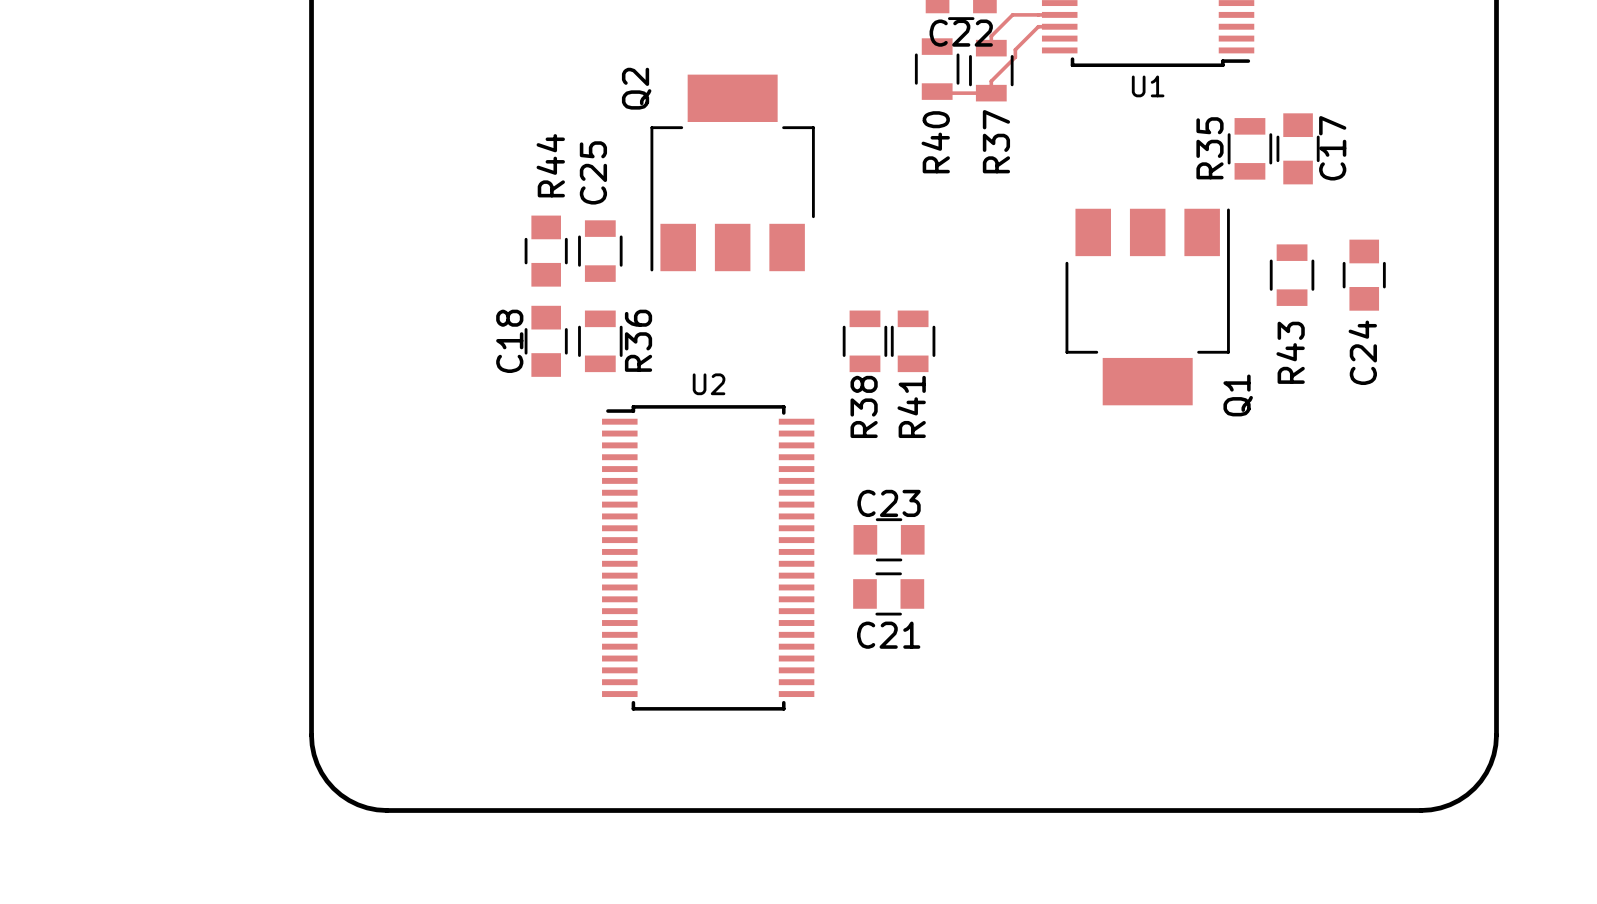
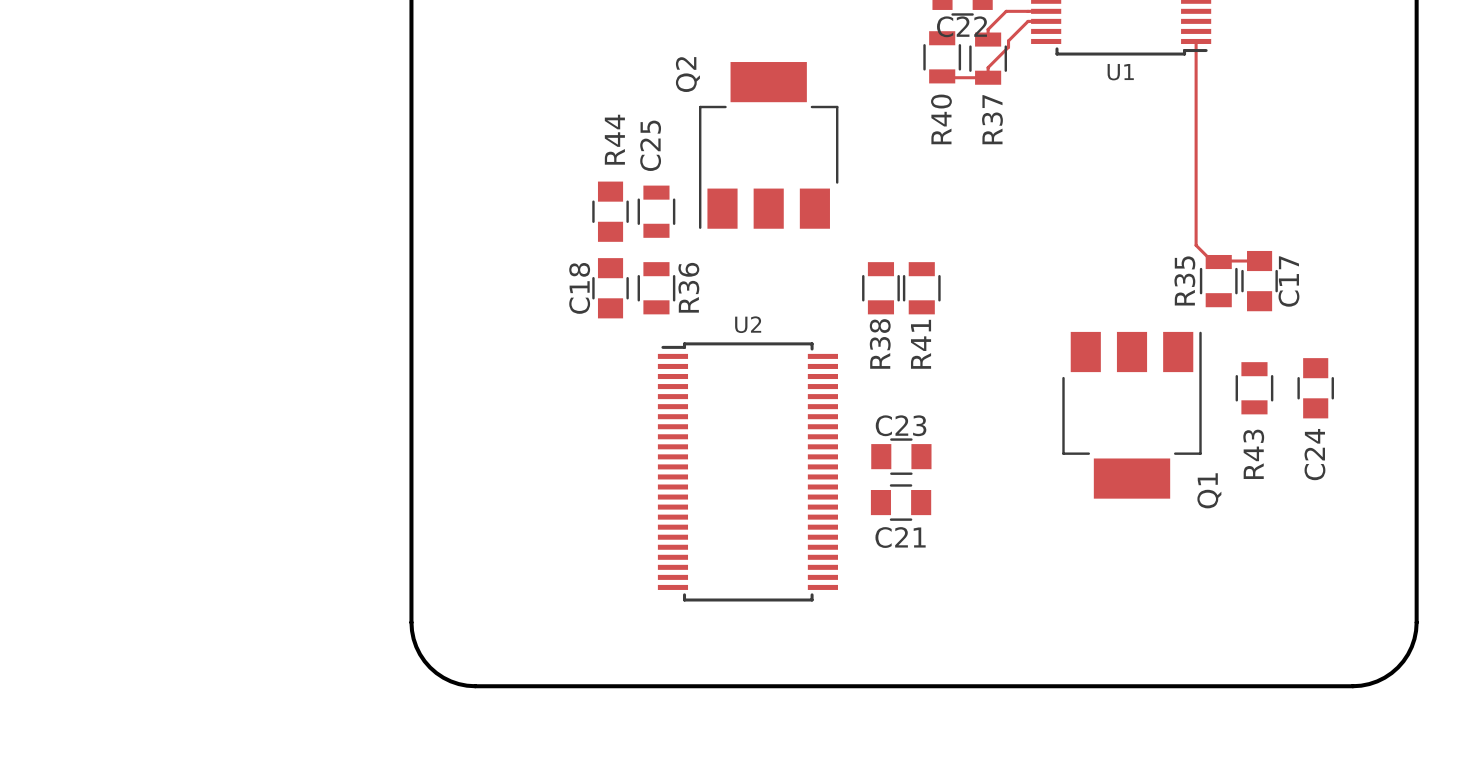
top track: none -> (1196, 41) (1196, 245) (1212, 262) (1259, 261)
R35 position: (1249, 148) -> (1218, 281)
C17 position: (1298, 148) -> (1259, 281)
R43 position: (1292, 275) -> (1254, 388)
C24 position: (1364, 275) -> (1315, 388)
Q1 position: (1147, 306) -> (1132, 415)

